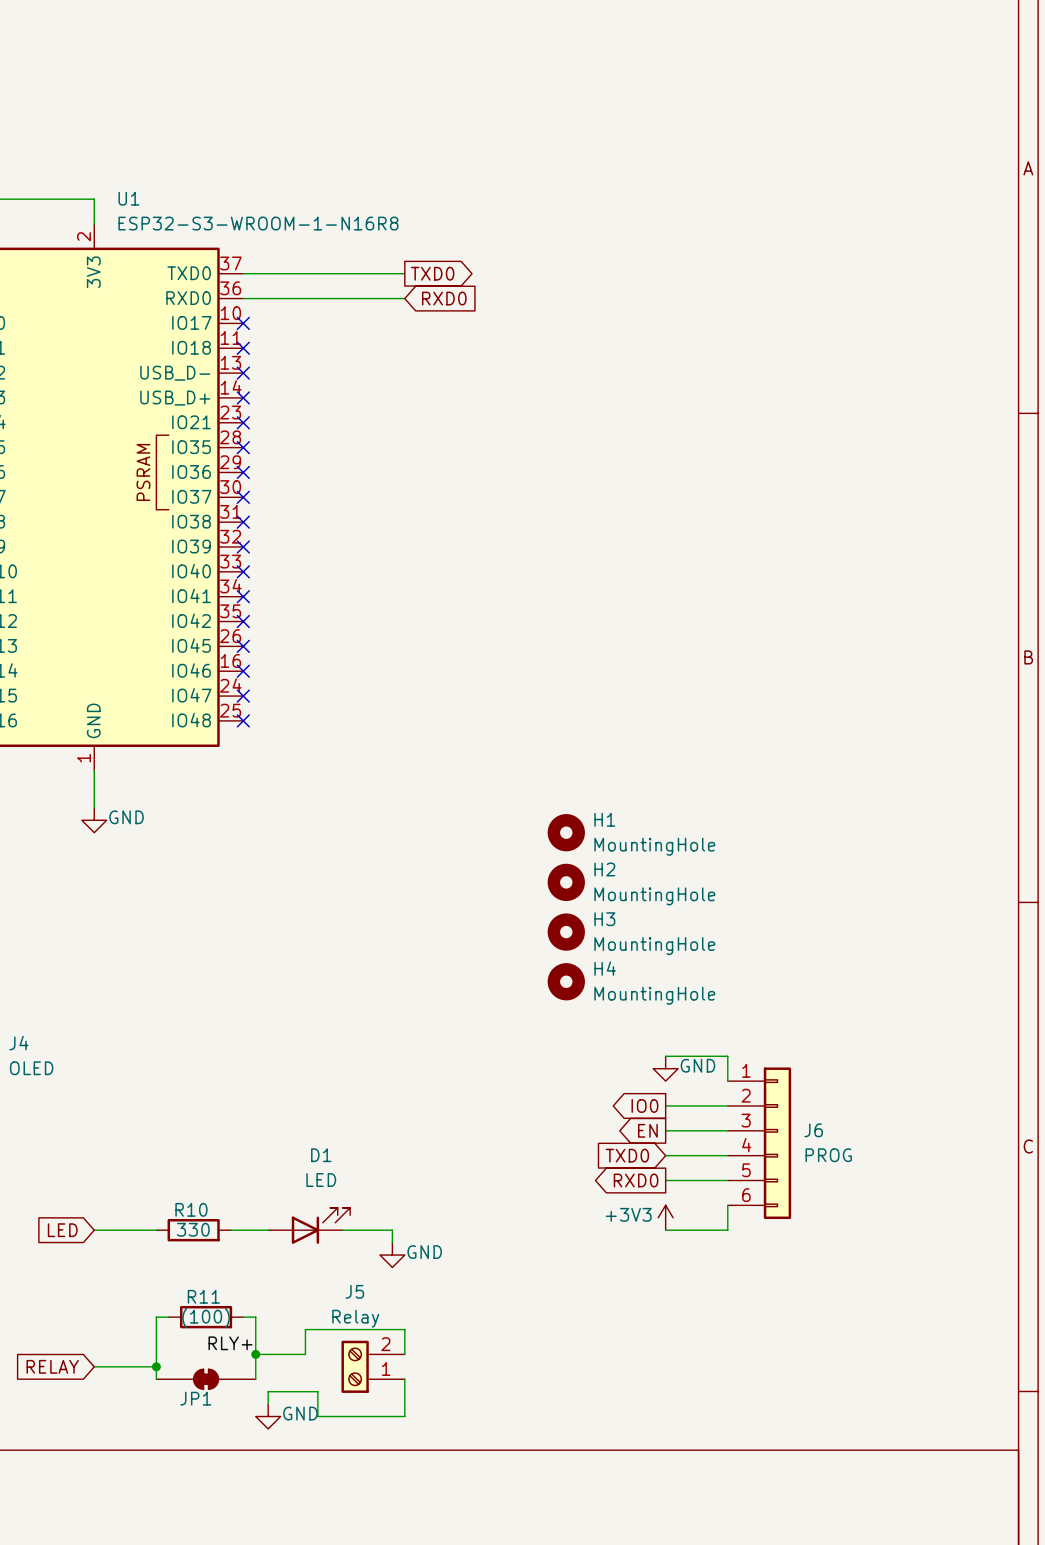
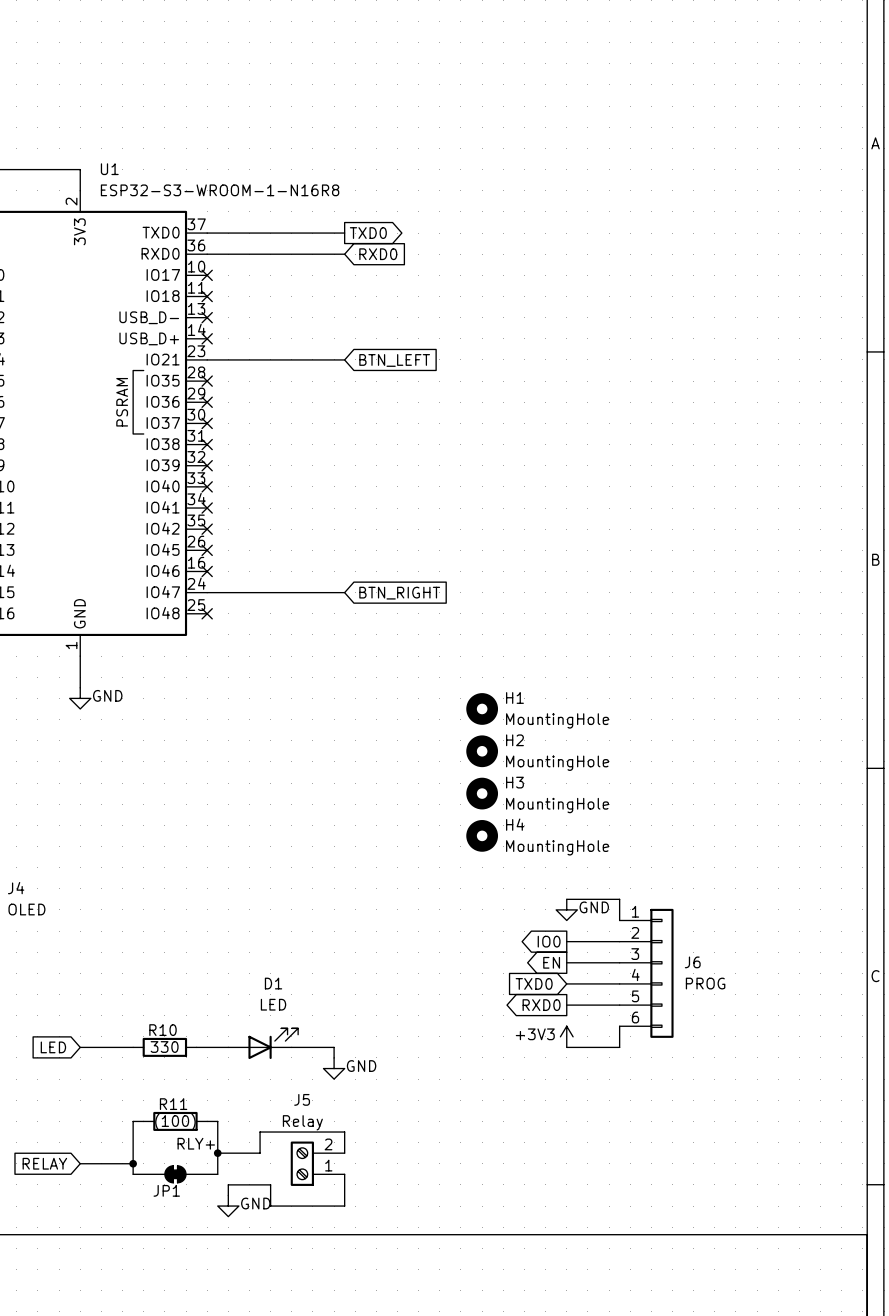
wire: none -> (207, 359) (344, 359)
no-connect mark: (243, 422) -> none
global label: none -> BTN_LEFT (394, 360)
wire: none -> (207, 592) (344, 592)
no-connect mark: (243, 696) -> none
global label: none -> BTN_RIGHT (399, 593)

